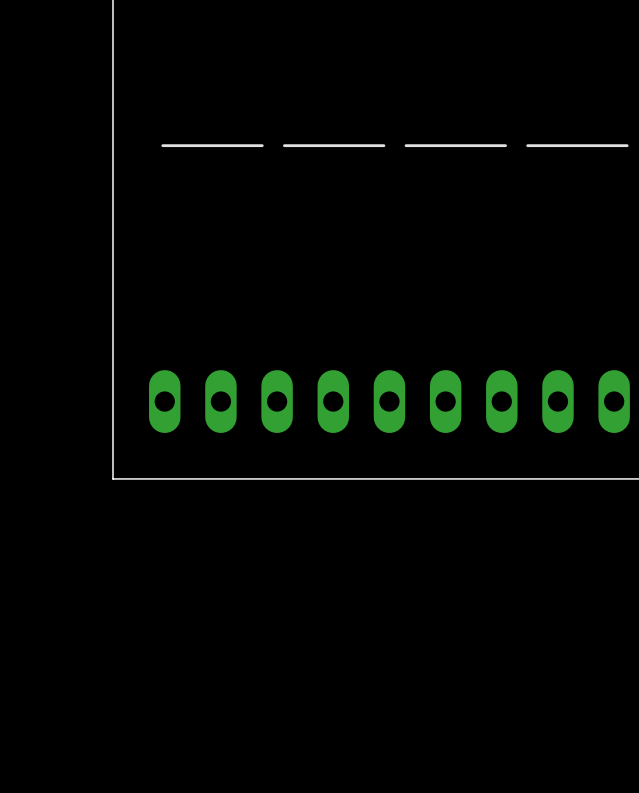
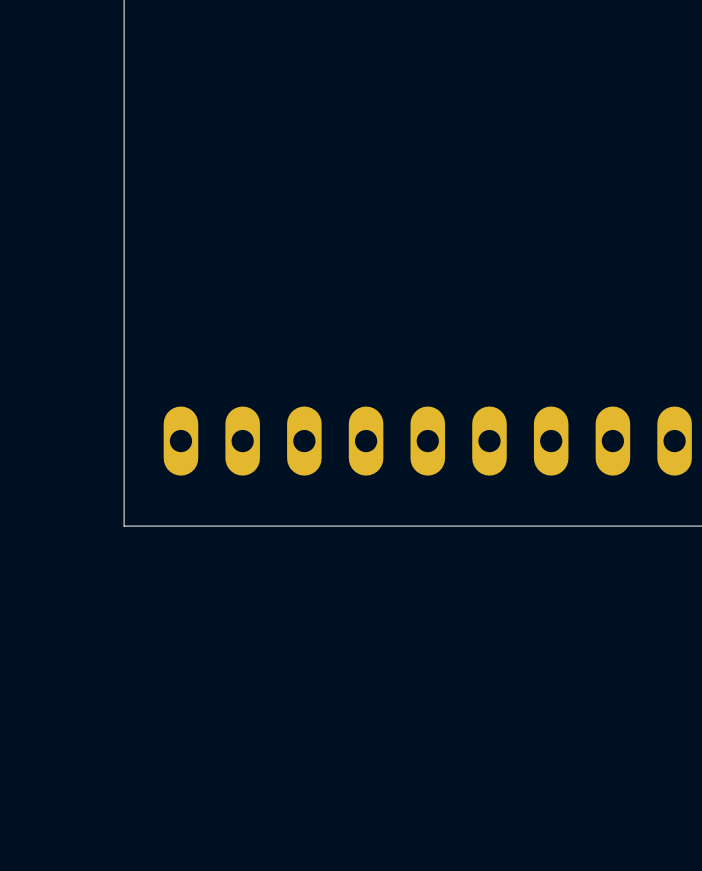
part: (212, 145) -> none
part: (334, 145) -> none
part: (455, 145) -> none
part: (577, 145) -> none

